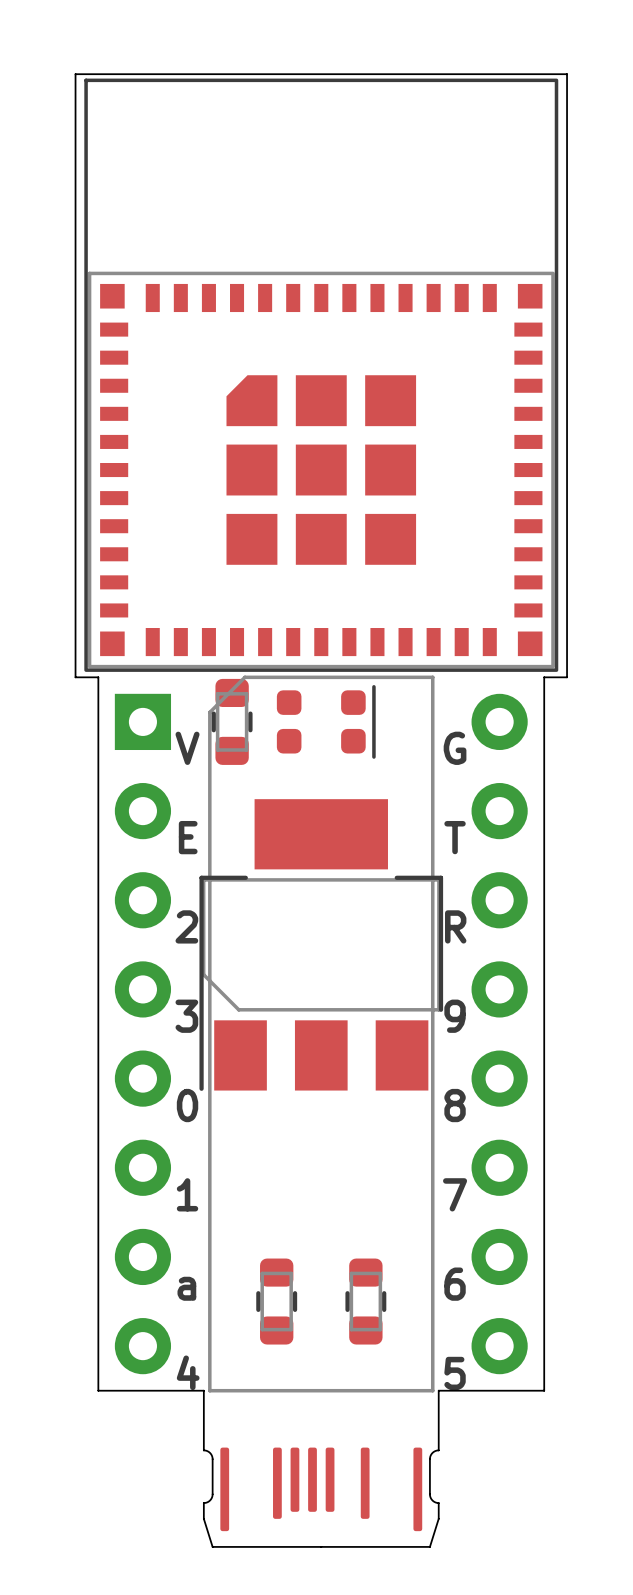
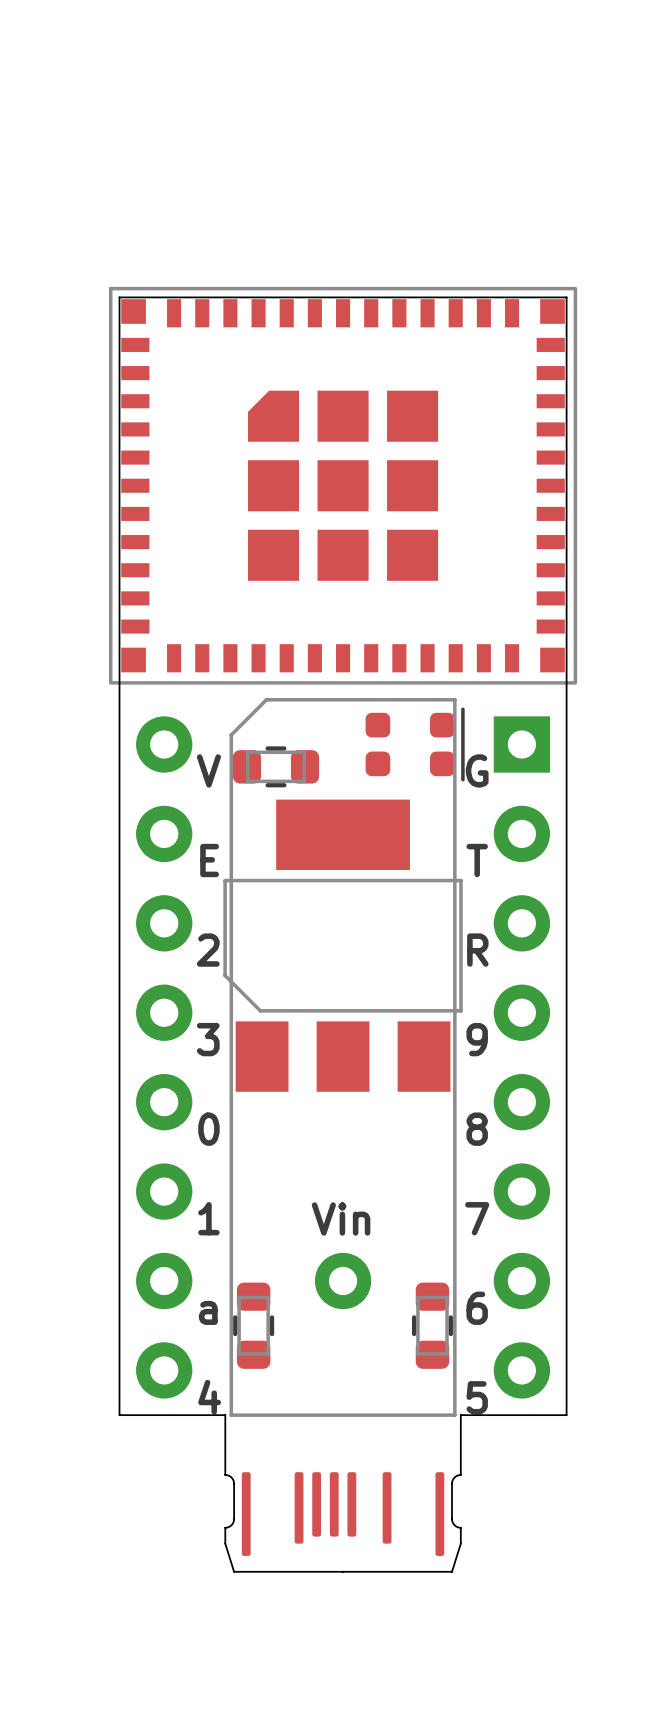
part: (321, 375) -> none
part: none -> (343, 485)
part footprint: [114, 675, 528, 1393] -> [136, 698, 551, 1417]
board edge: (98, 677) (75, 677) (75, 74) (567, 74) (567, 677) (544, 677) -> (119, 699) (119, 297) (566, 297) (566, 699)
part rotation: 0° (232, 721) -> 90° clockwise (275, 766)
part position: (326, 721) -> (415, 744)
part footprint: [199, 799, 444, 1091] -> [223, 799, 463, 1092]
text: none -> Vin (341, 1218)
part: none -> (343, 1281)
part position: (276, 1301) -> (253, 1325)
part position: (365, 1301) -> (432, 1325)

